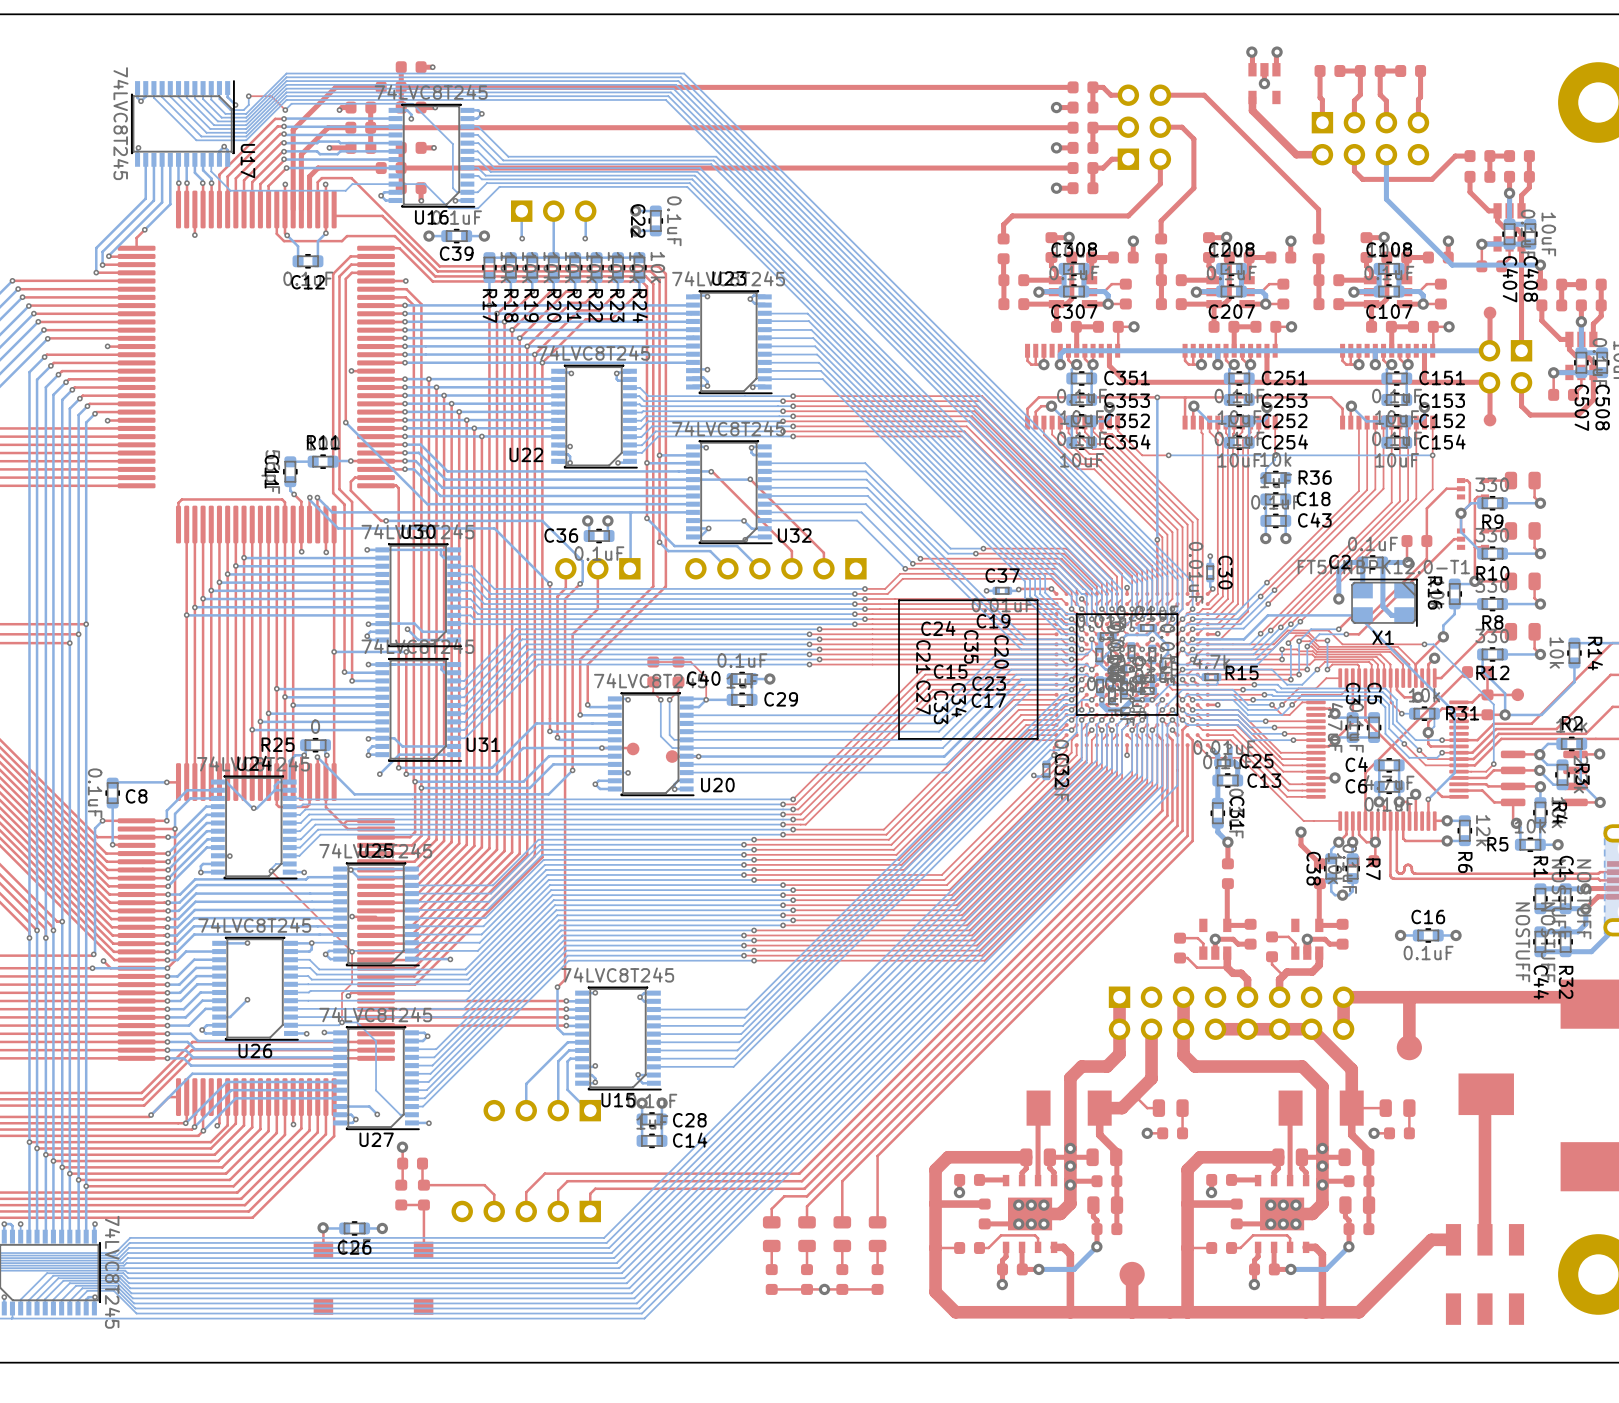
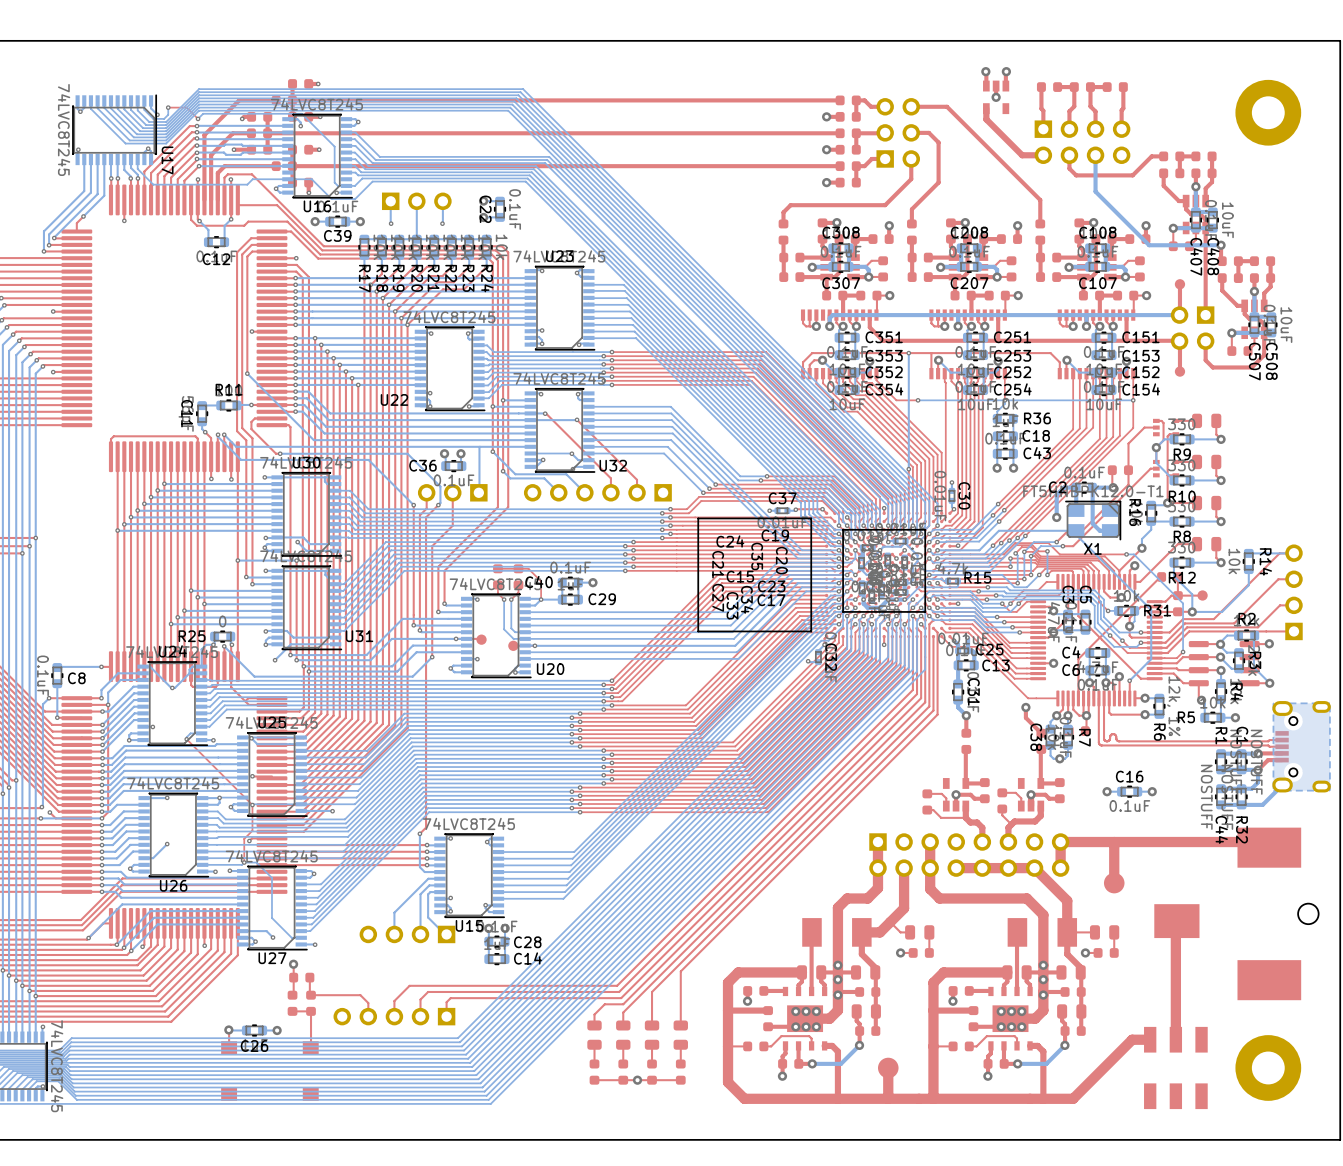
R6 value: 12k (1483, 830) -> 12k, 1% (1173, 706)

